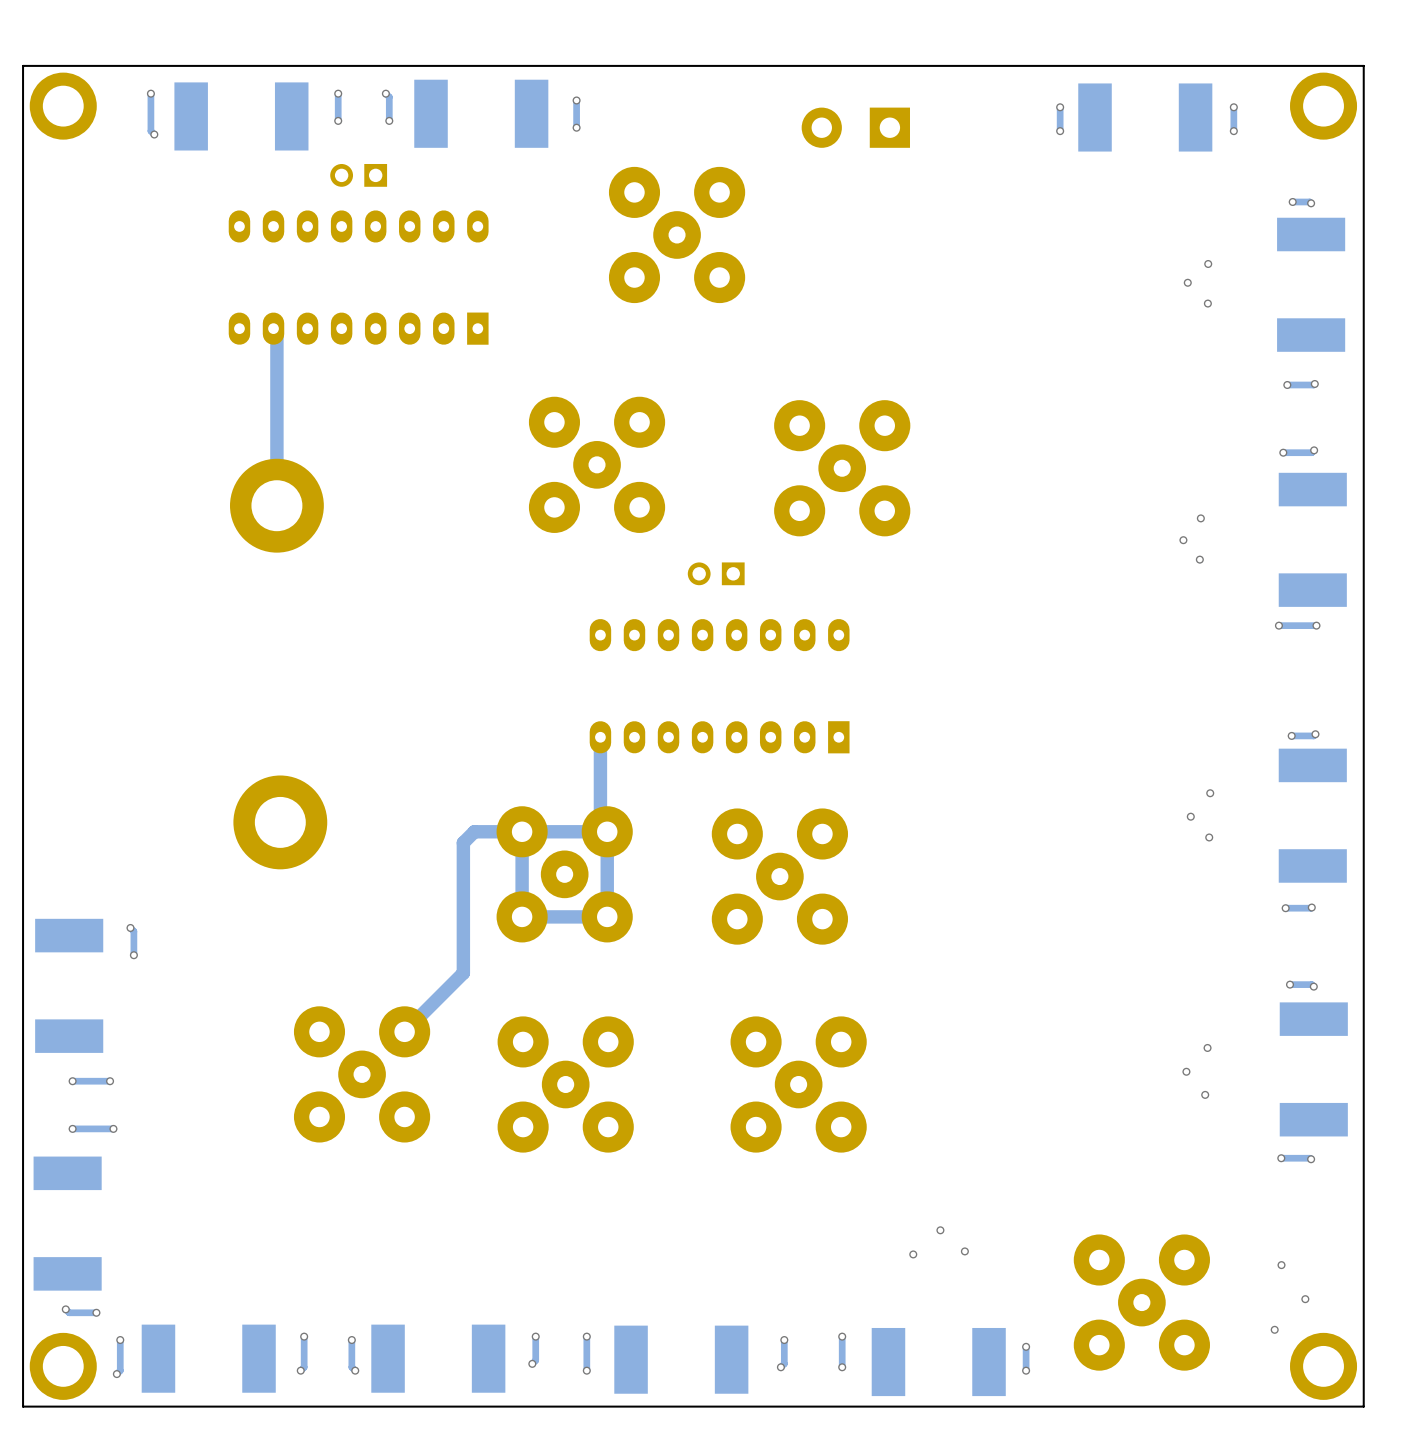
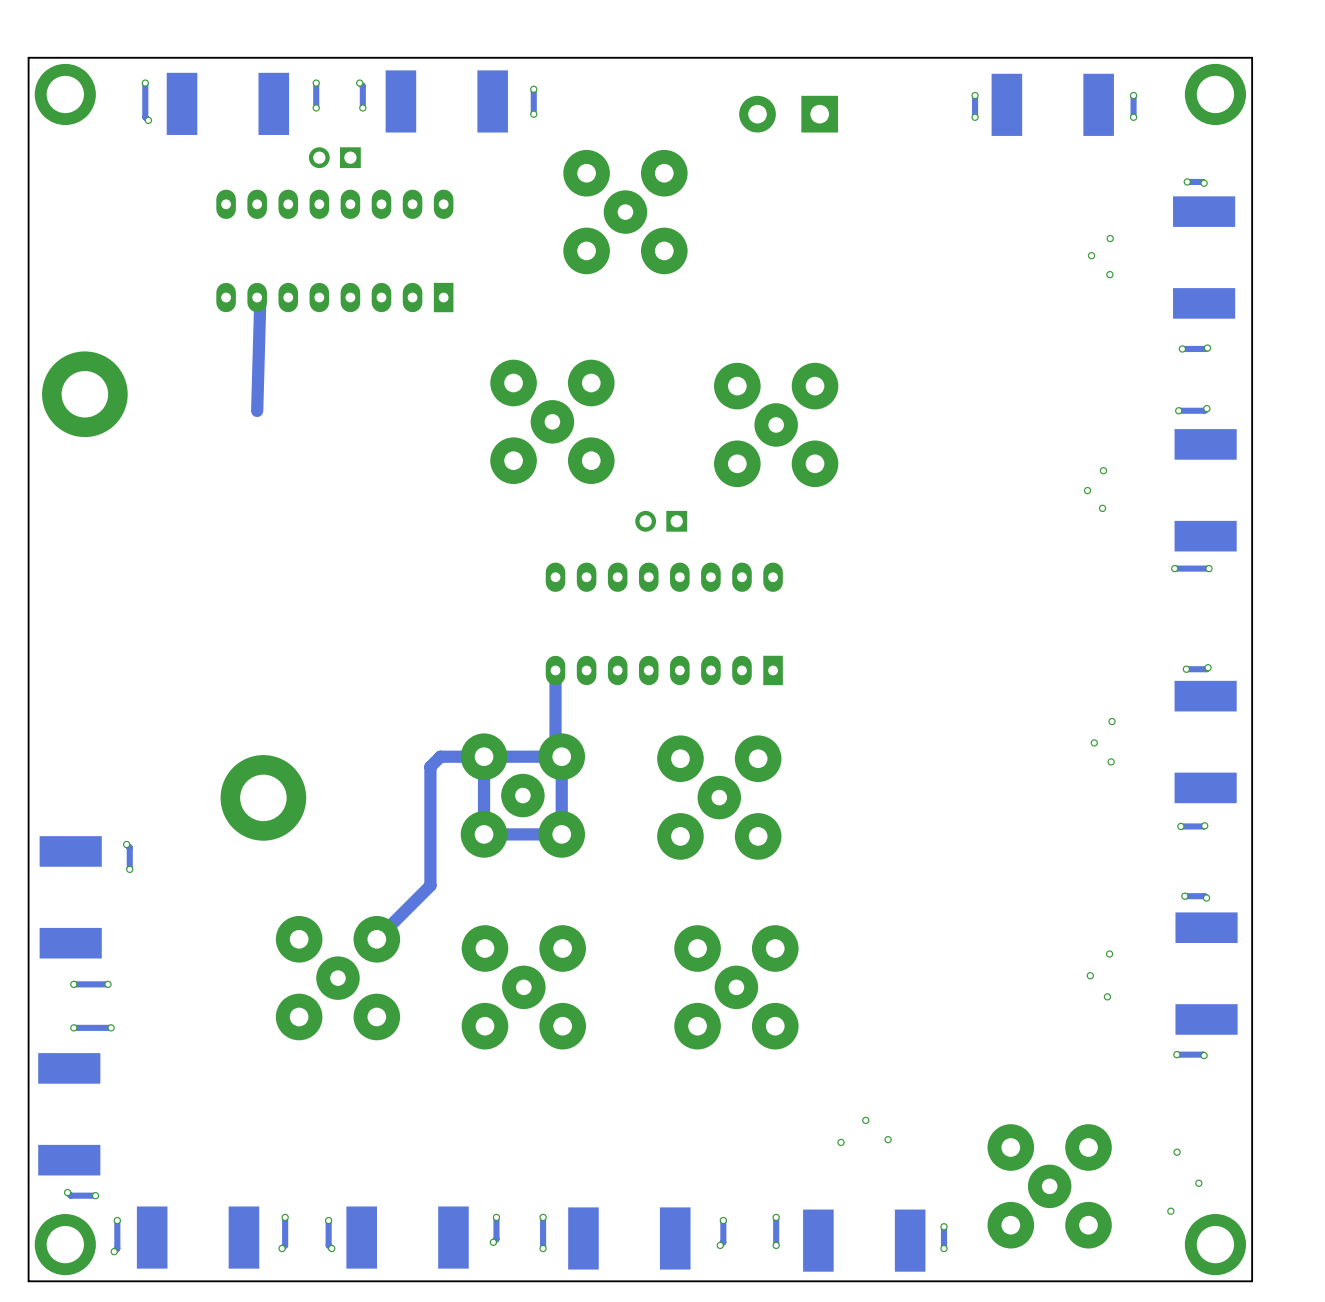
track: (276, 332) (276, 505) -> (260, 300) (257, 410)
part: none -> (84, 394)
part: (276, 505) -> none
part position: (280, 822) -> (263, 797)

